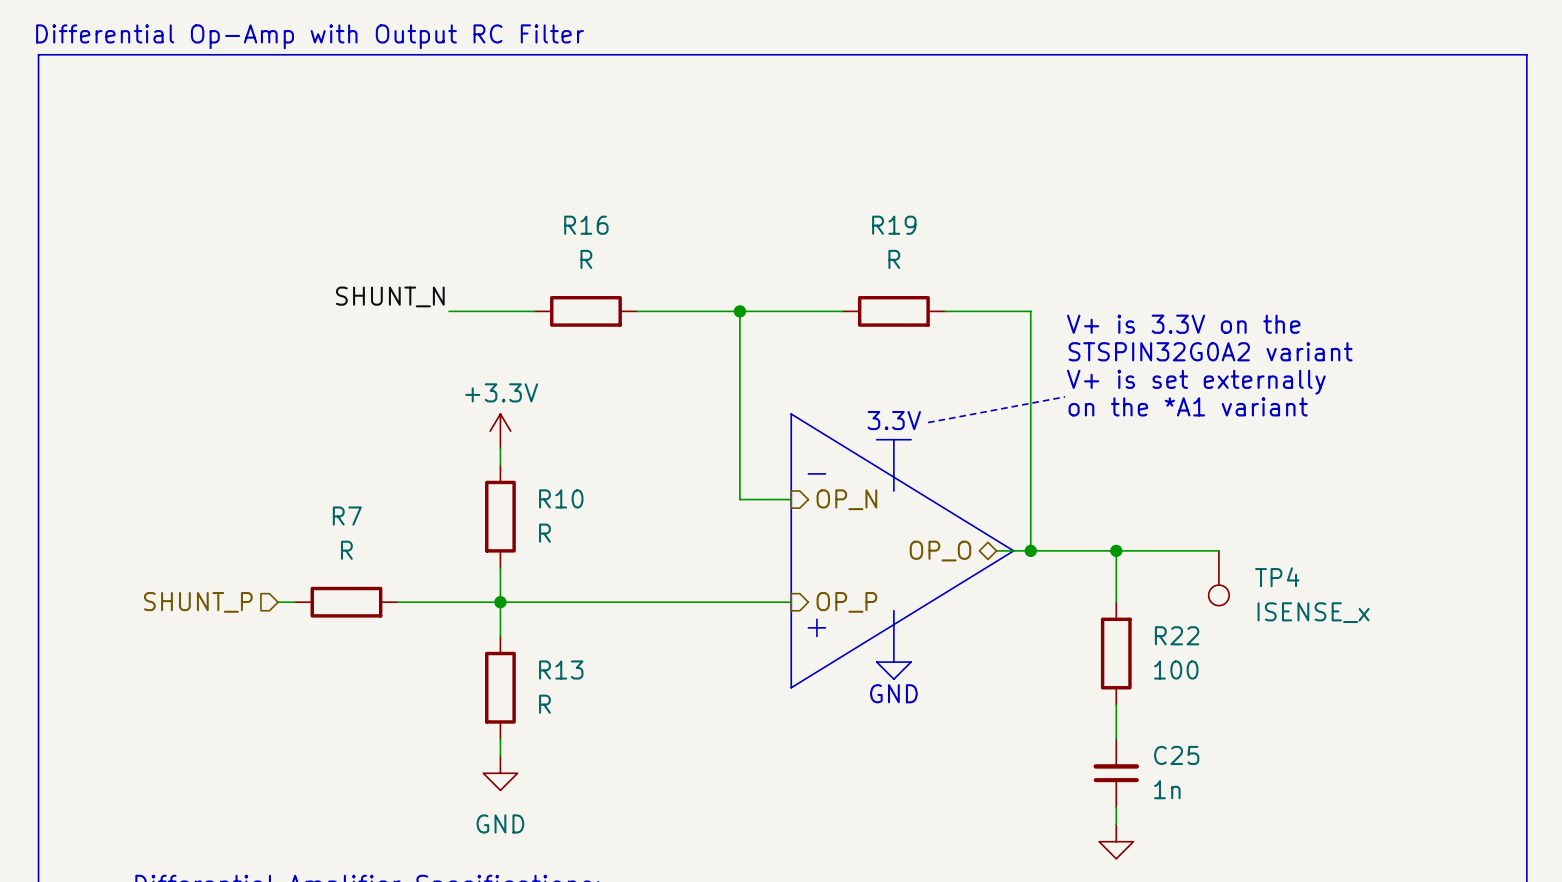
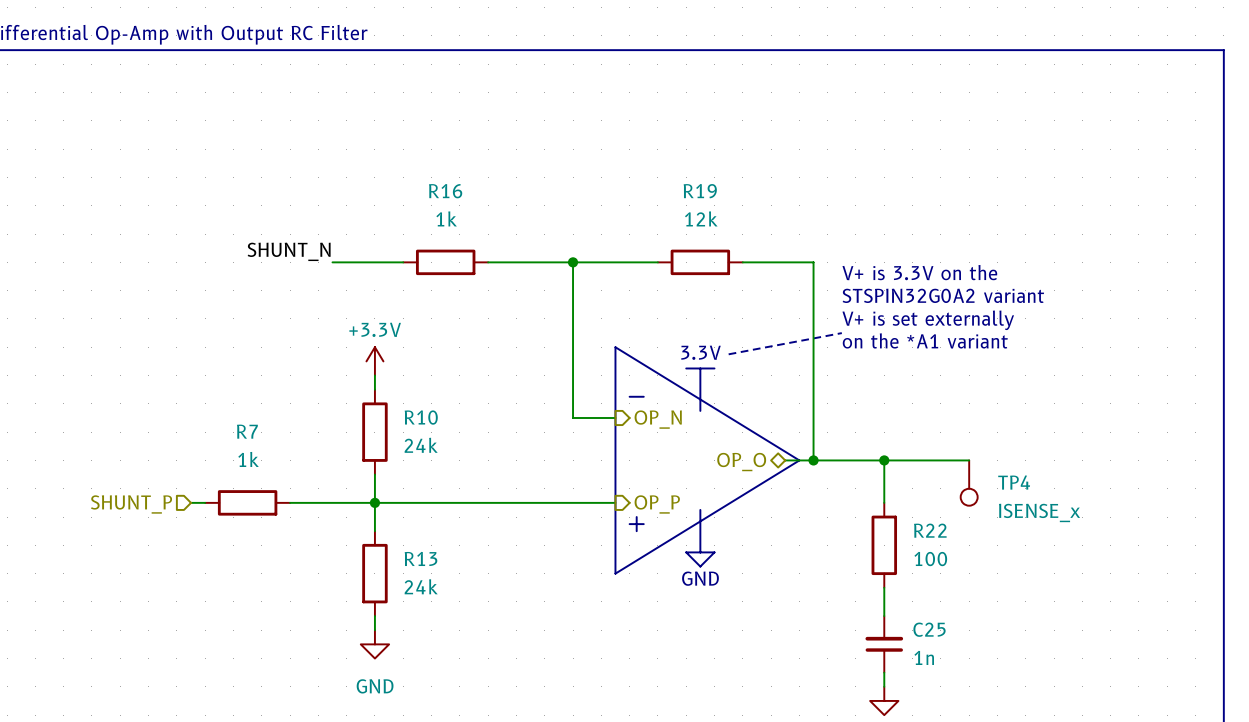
R16 value: R (586, 259) -> 1k (446, 218)
R19 value: R (894, 259) -> 12k (701, 218)
R10 value: R (544, 533) -> 24k (421, 445)
R7 value: R (346, 550) -> 1k (248, 459)
R13 value: R (544, 704) -> 24k (421, 586)

